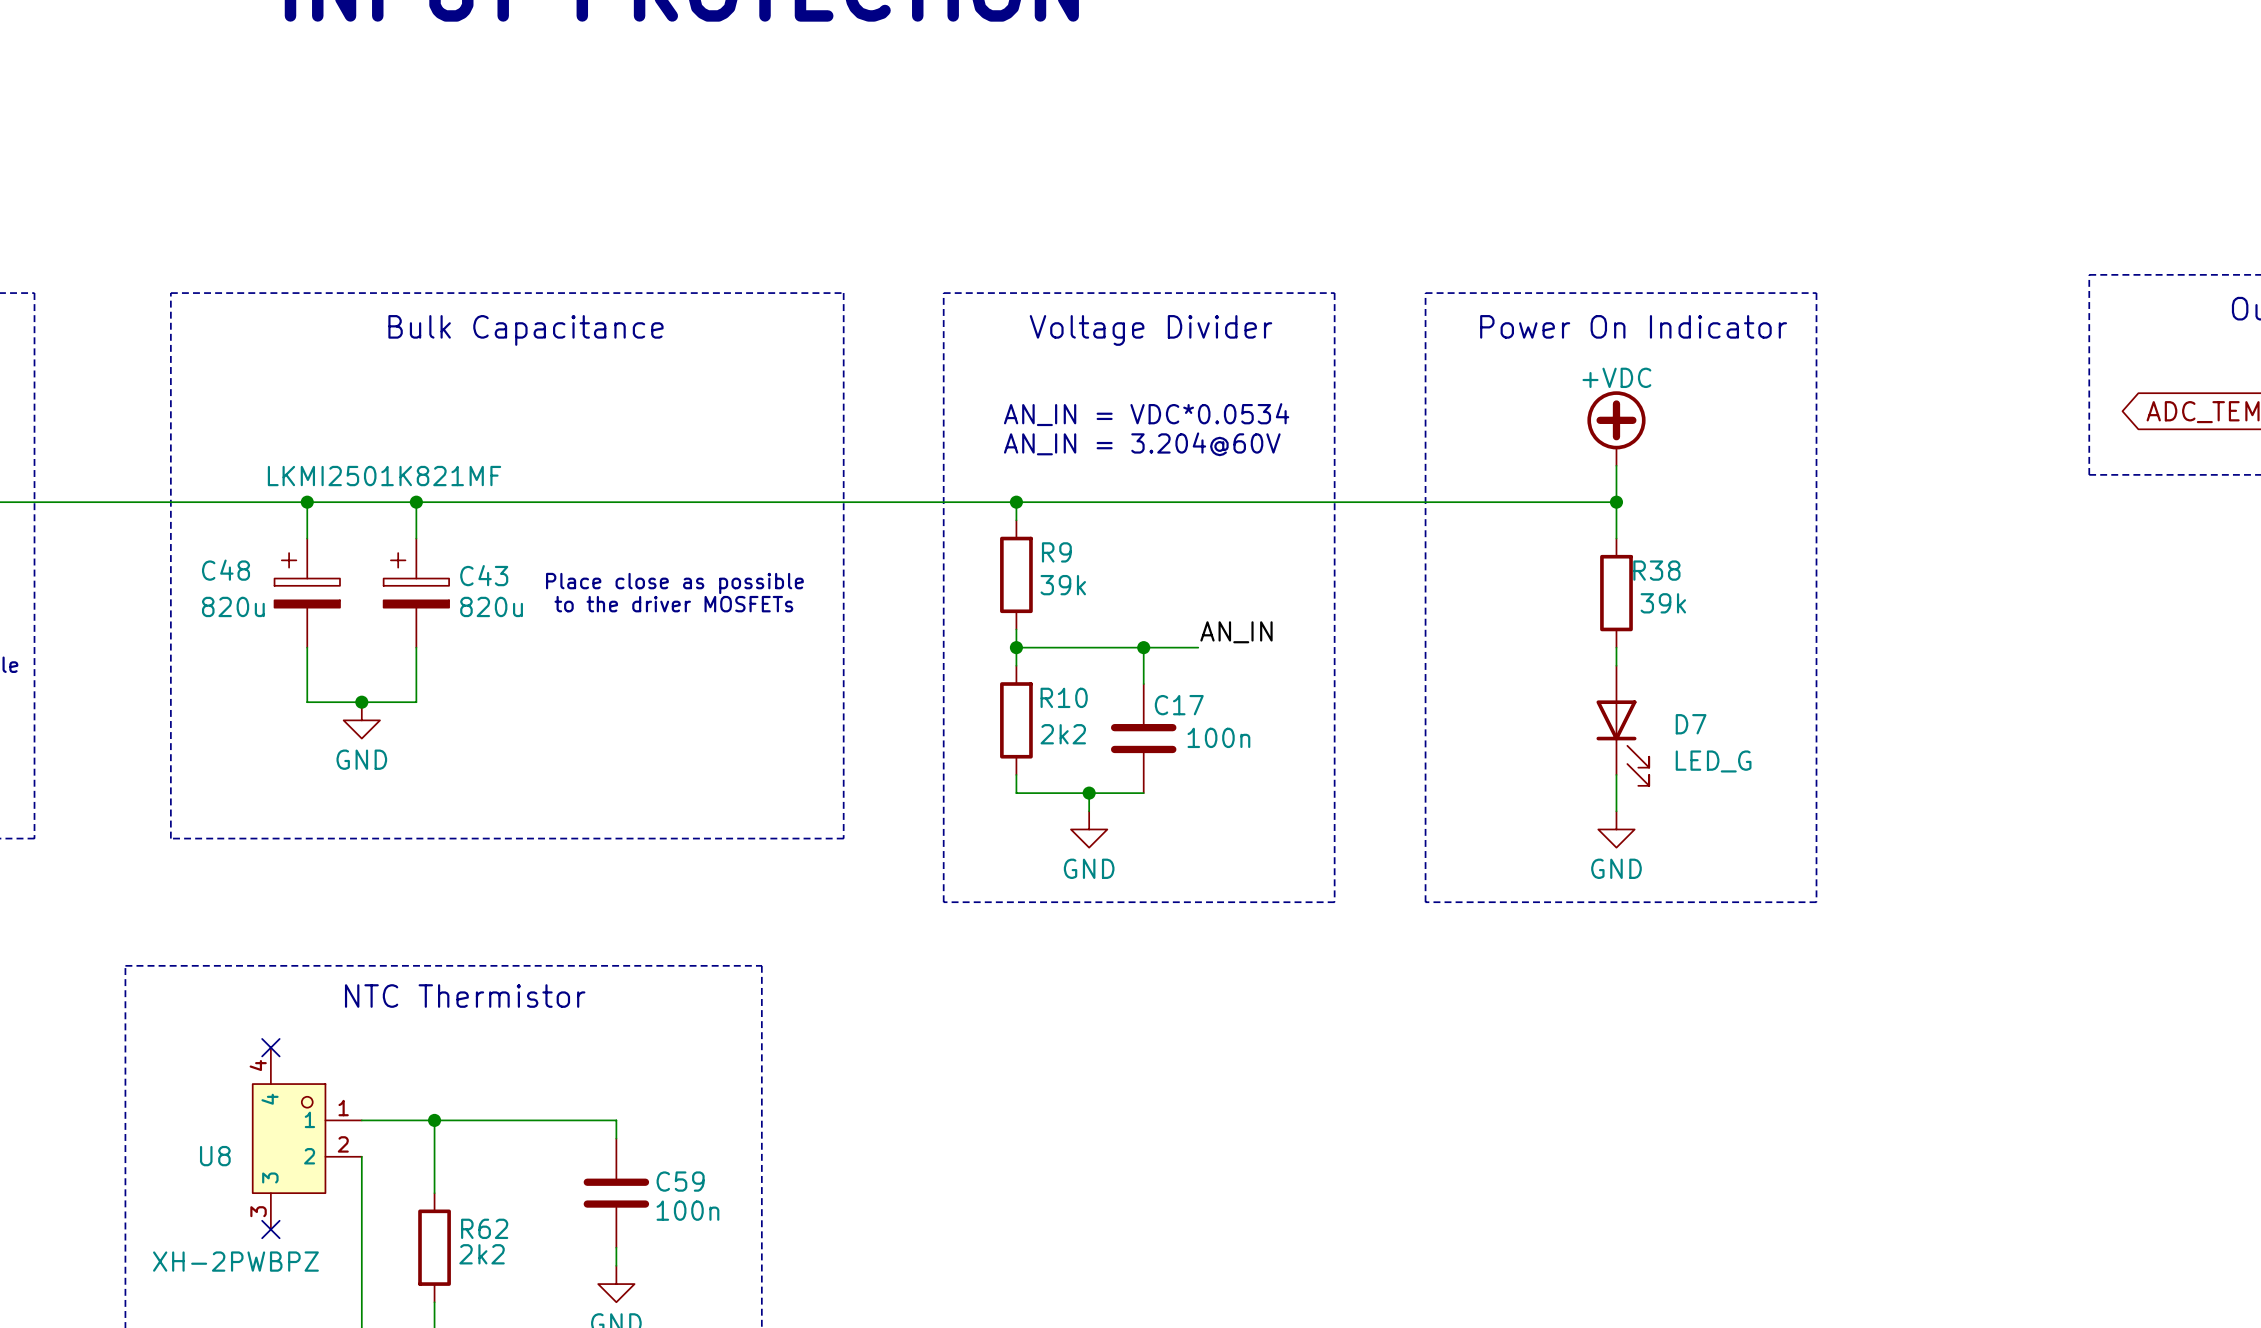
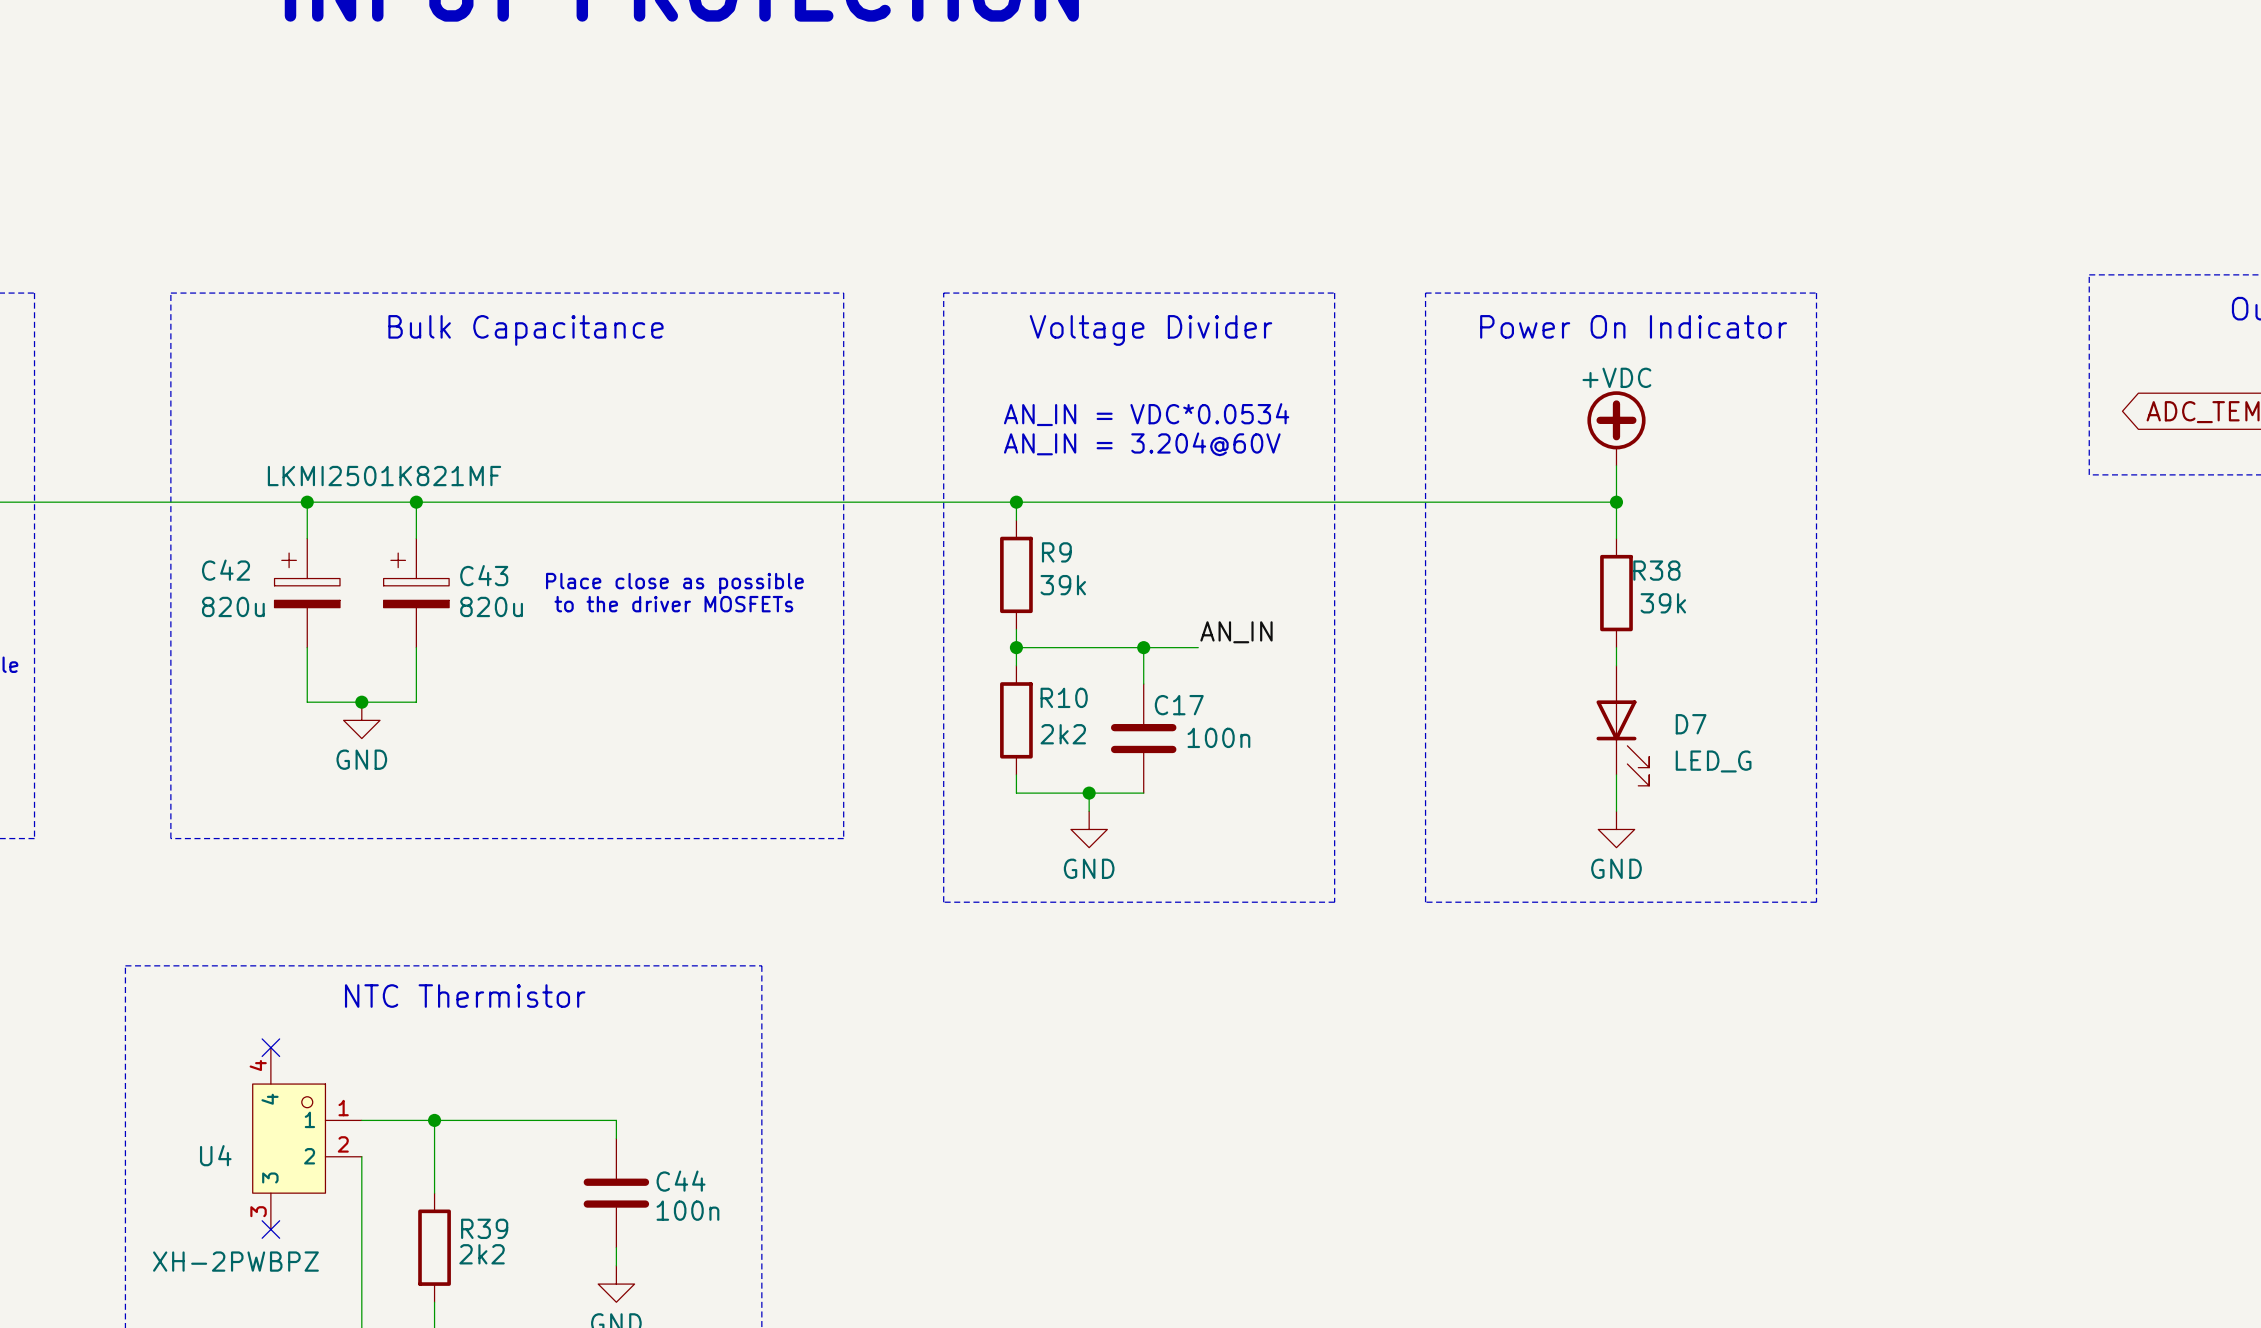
C48 name: C48 (226, 570) -> C42 (226, 570)
U8 name: U8 (215, 1156) -> U4 (215, 1155)
C59 name: C59 (680, 1181) -> C44 (681, 1181)
R62 name: R62 (484, 1228) -> R39 (484, 1228)

